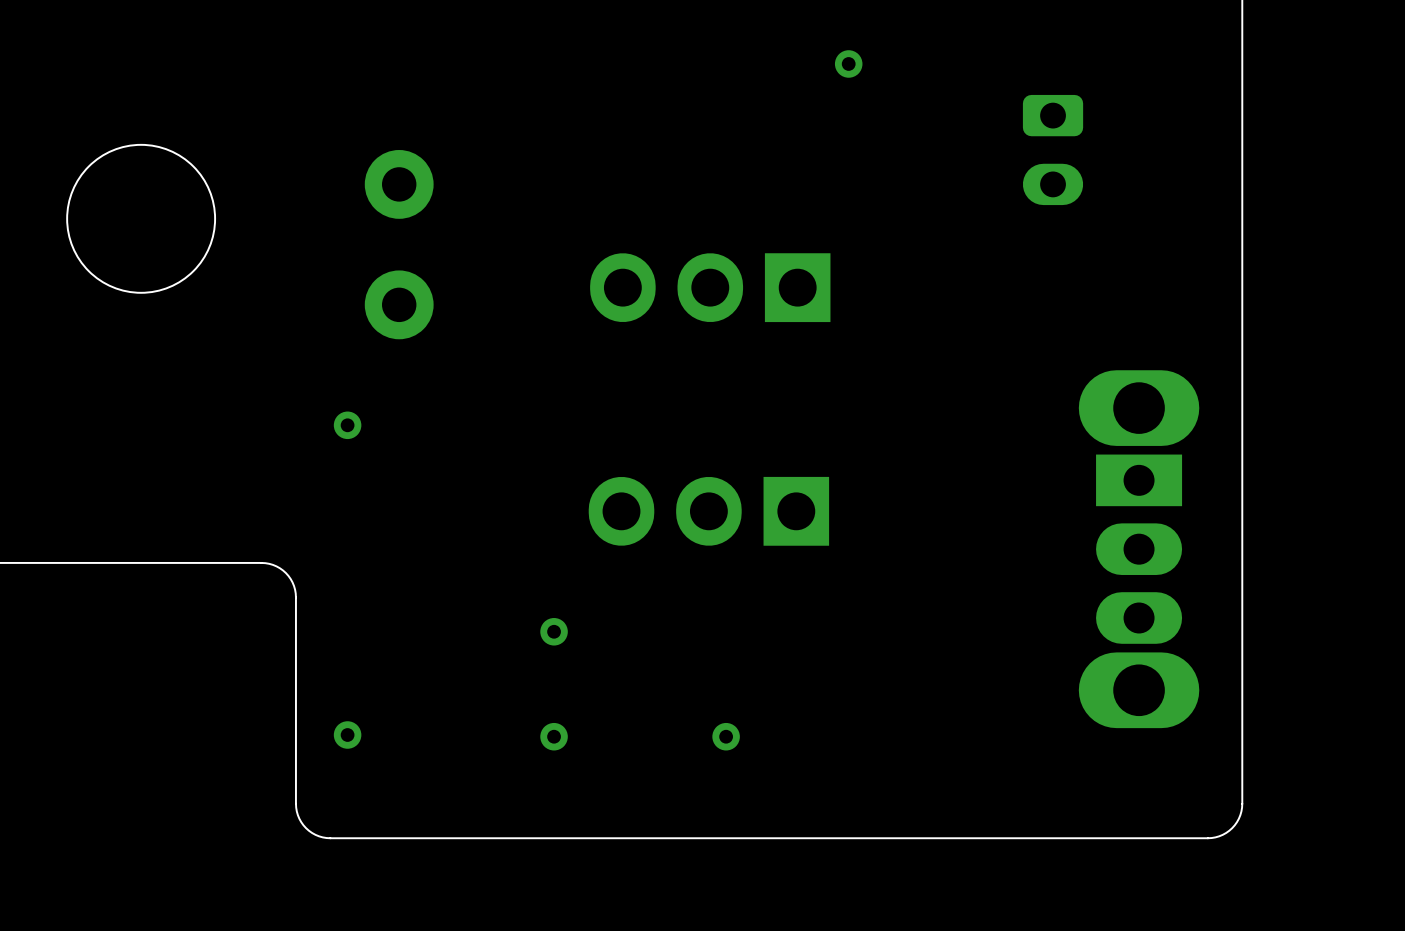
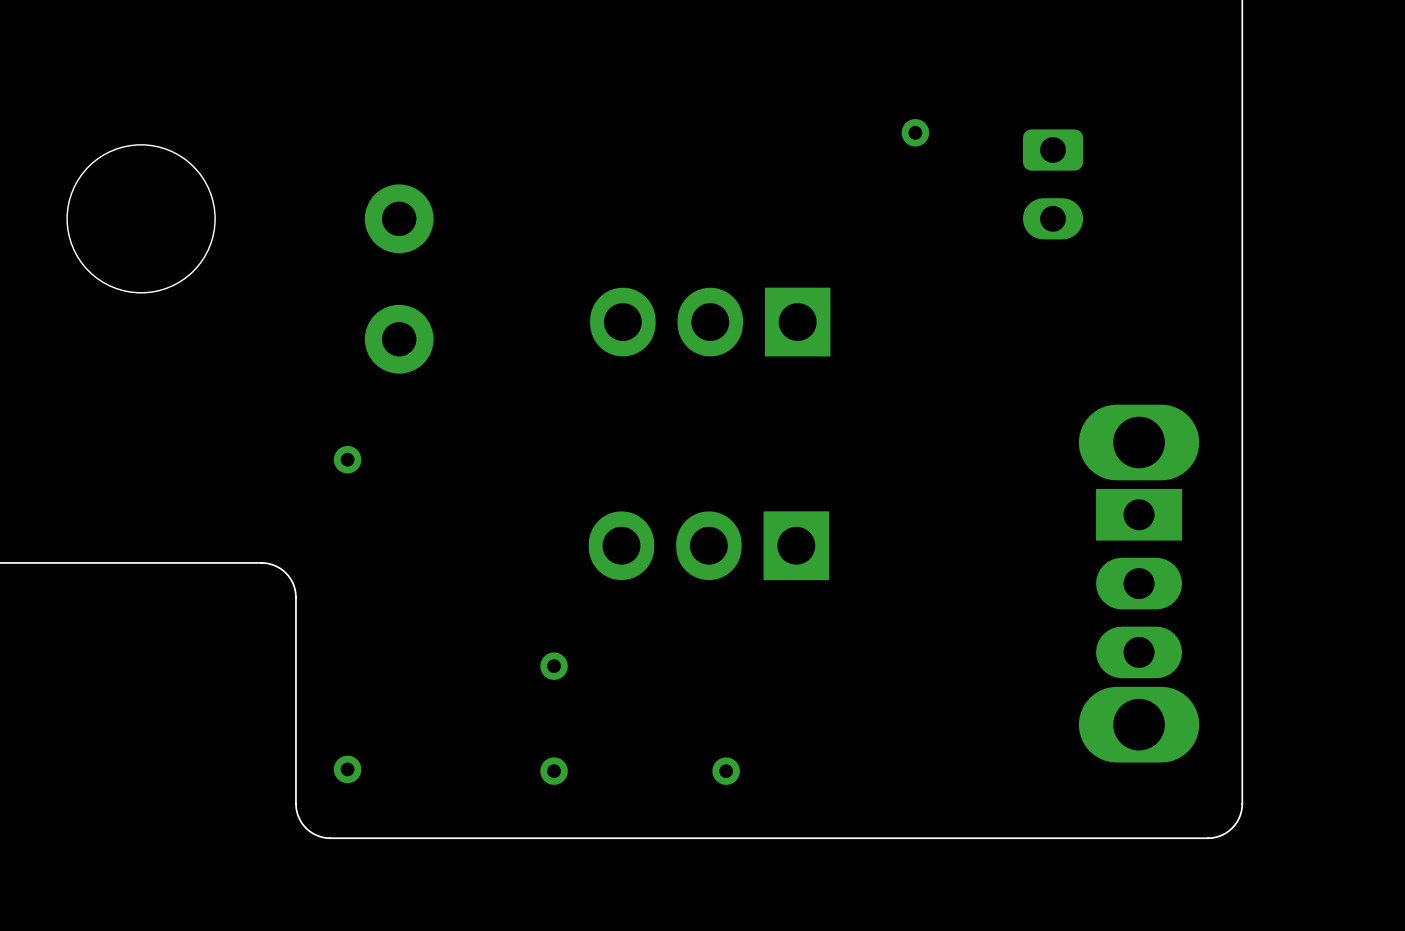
via position: (848, 63) -> (915, 132)
part position: (1053, 150) -> (1053, 184)
part position: (399, 184) -> (399, 218)
part position: (710, 287) -> (710, 322)
part position: (399, 304) -> (399, 339)
via position: (347, 425) -> (347, 459)
part position: (708, 511) -> (708, 545)
part position: (1139, 549) -> (1139, 583)
via position: (554, 631) -> (554, 666)
via position: (347, 735) -> (347, 769)
via position: (554, 736) -> (554, 771)
via position: (726, 736) -> (726, 771)

